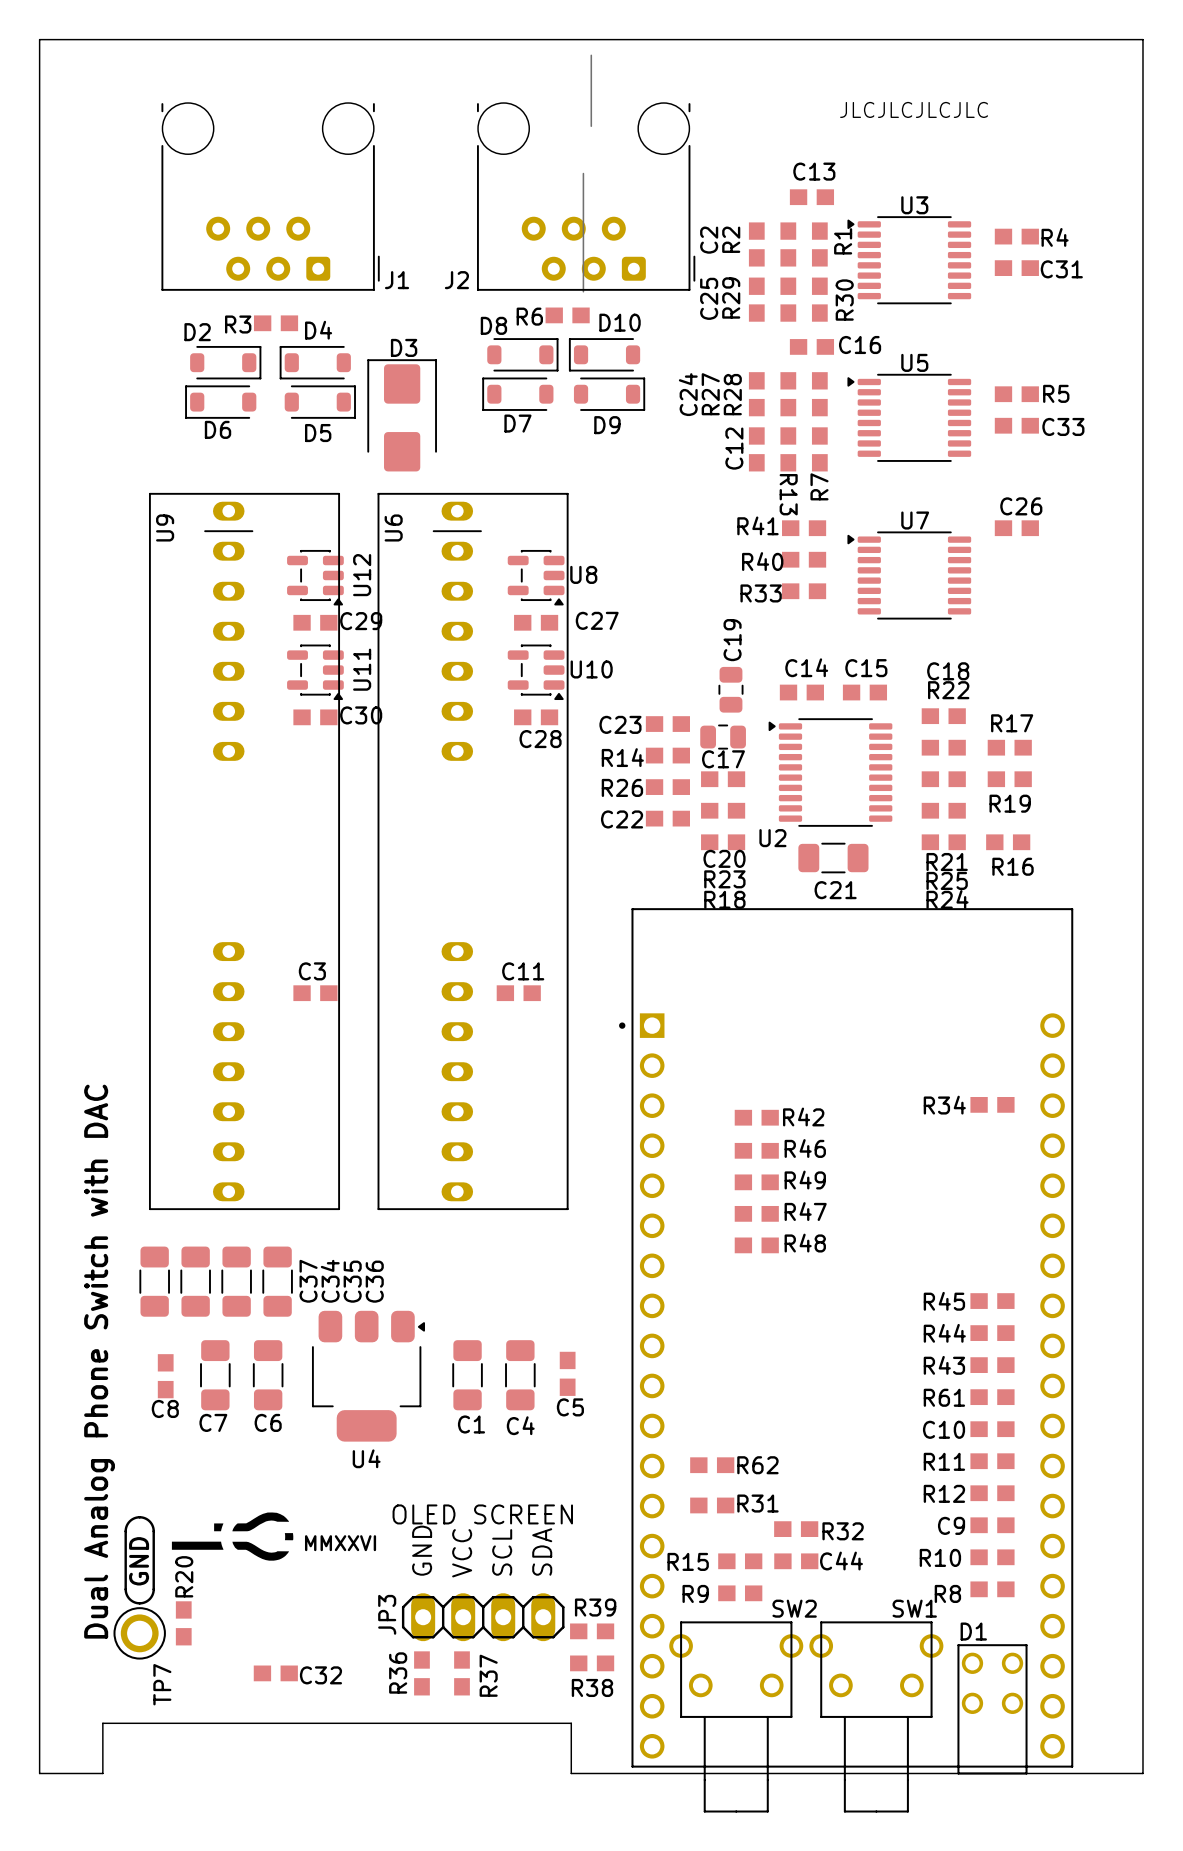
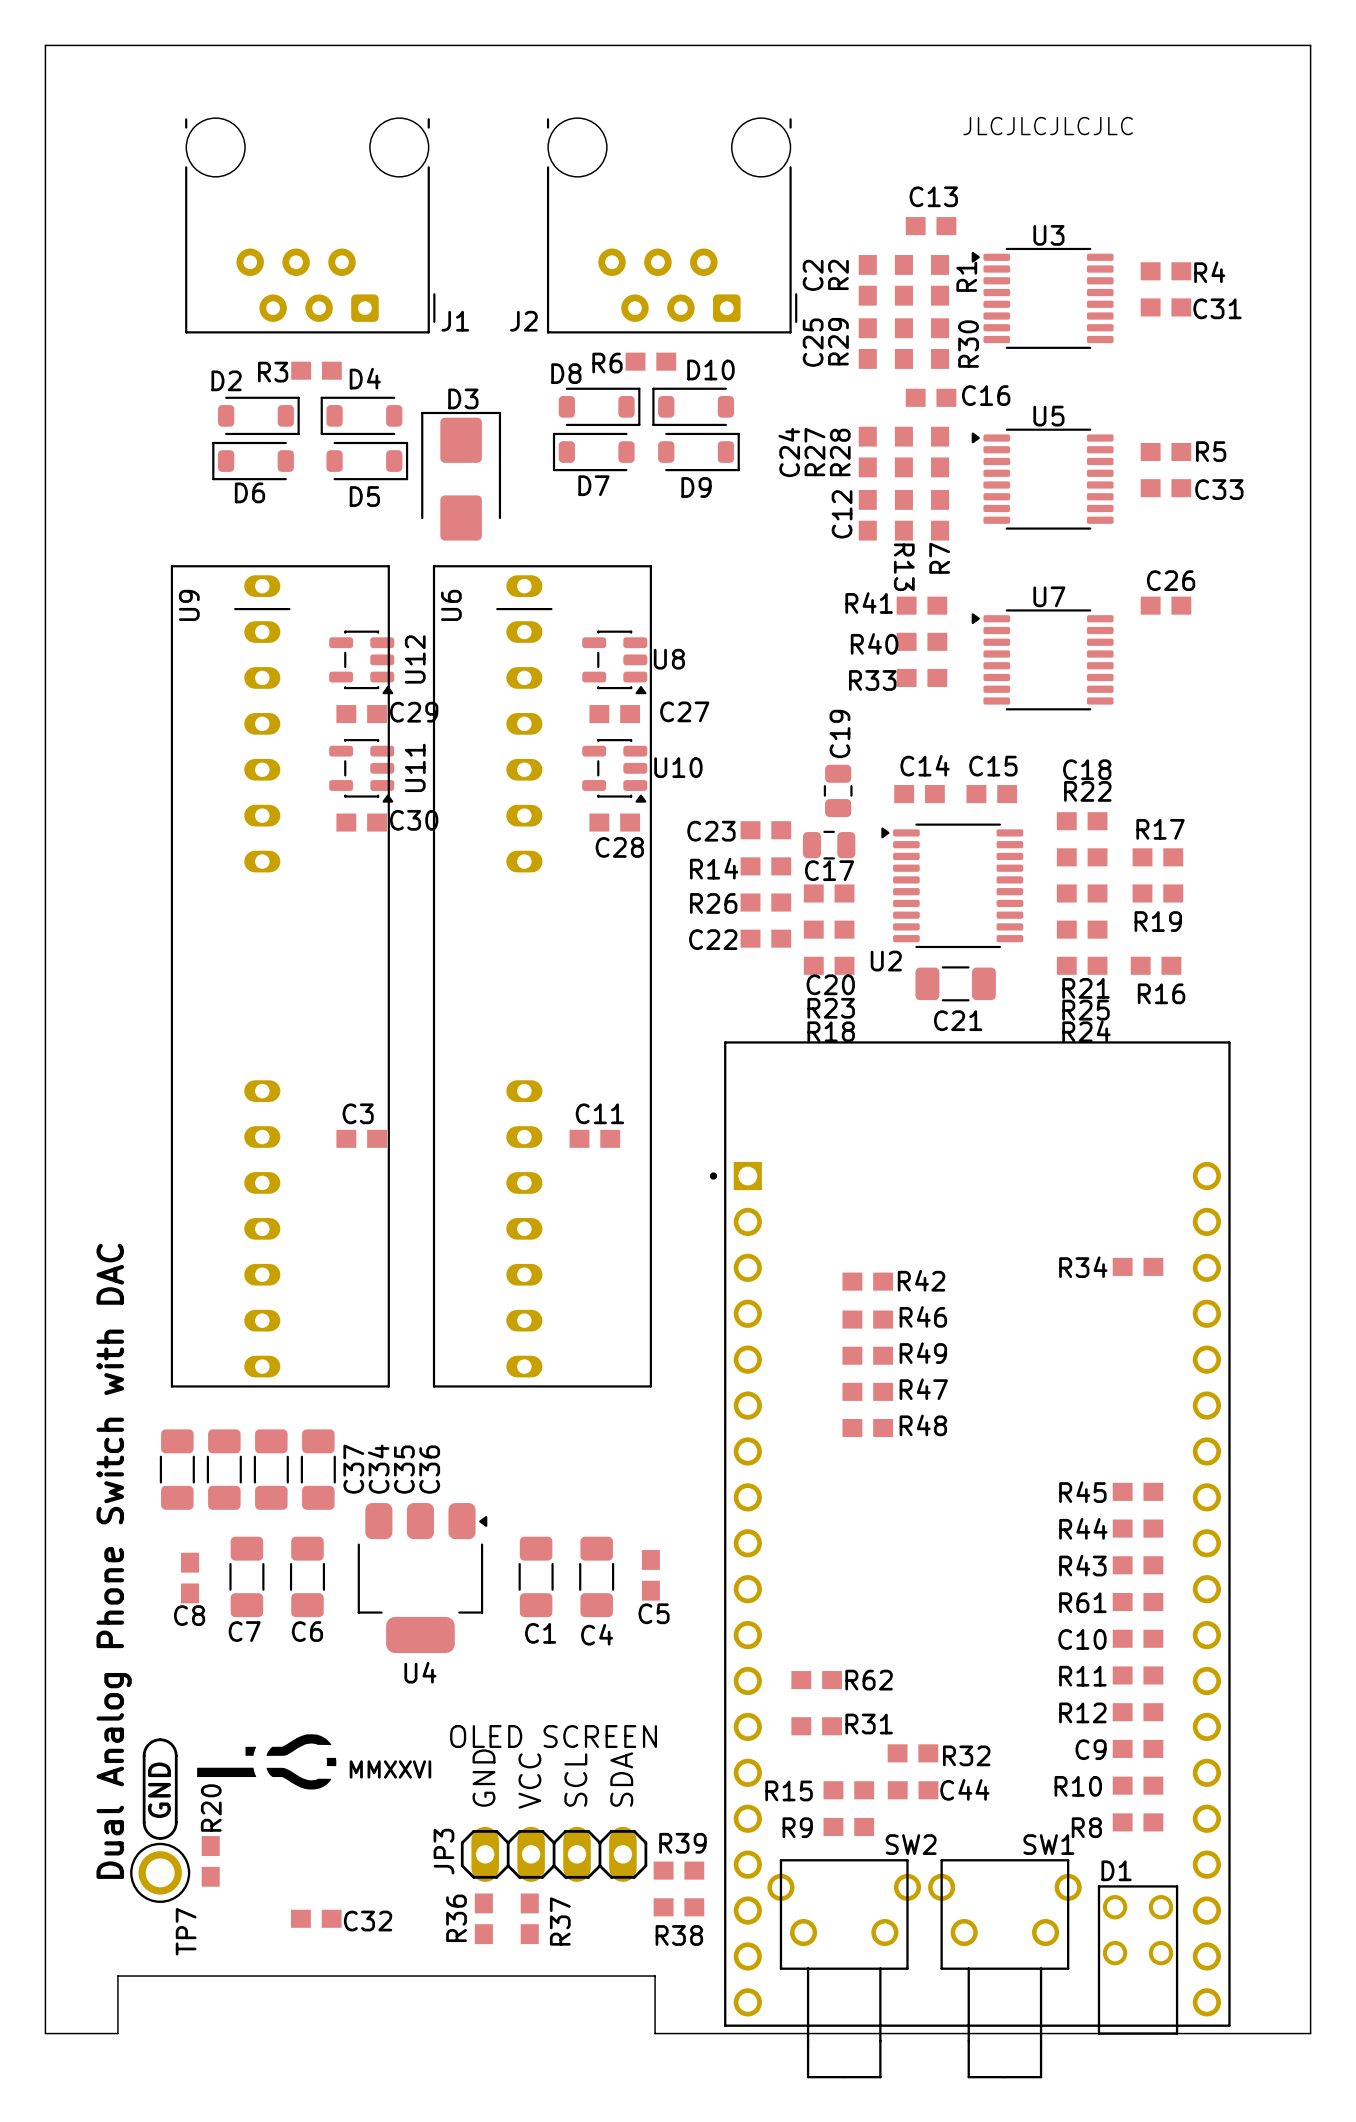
line: (591, 55) (591, 126) -> none
line: (583, 173) (583, 291) -> none

